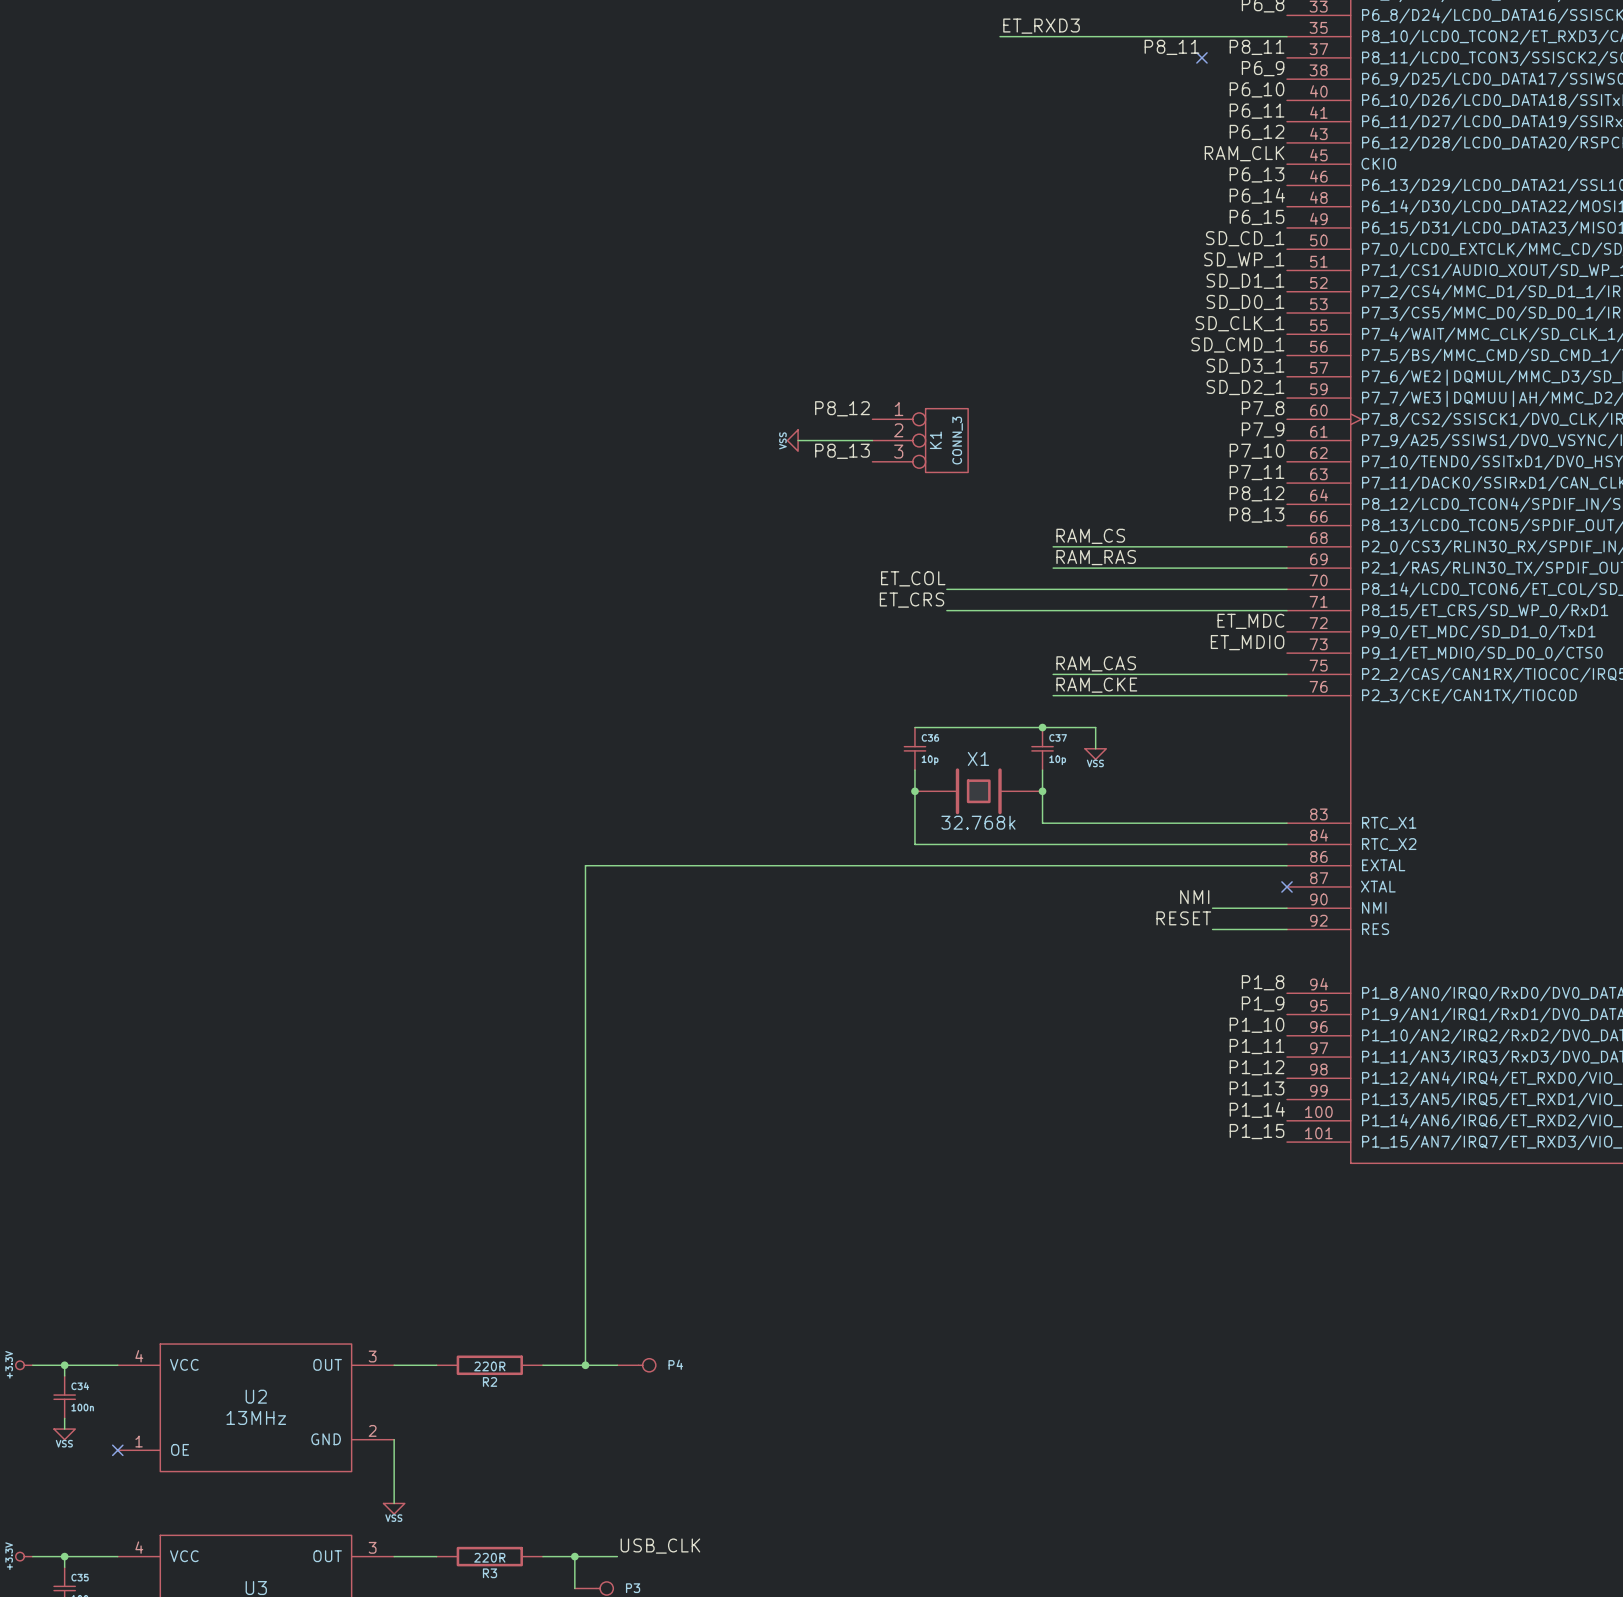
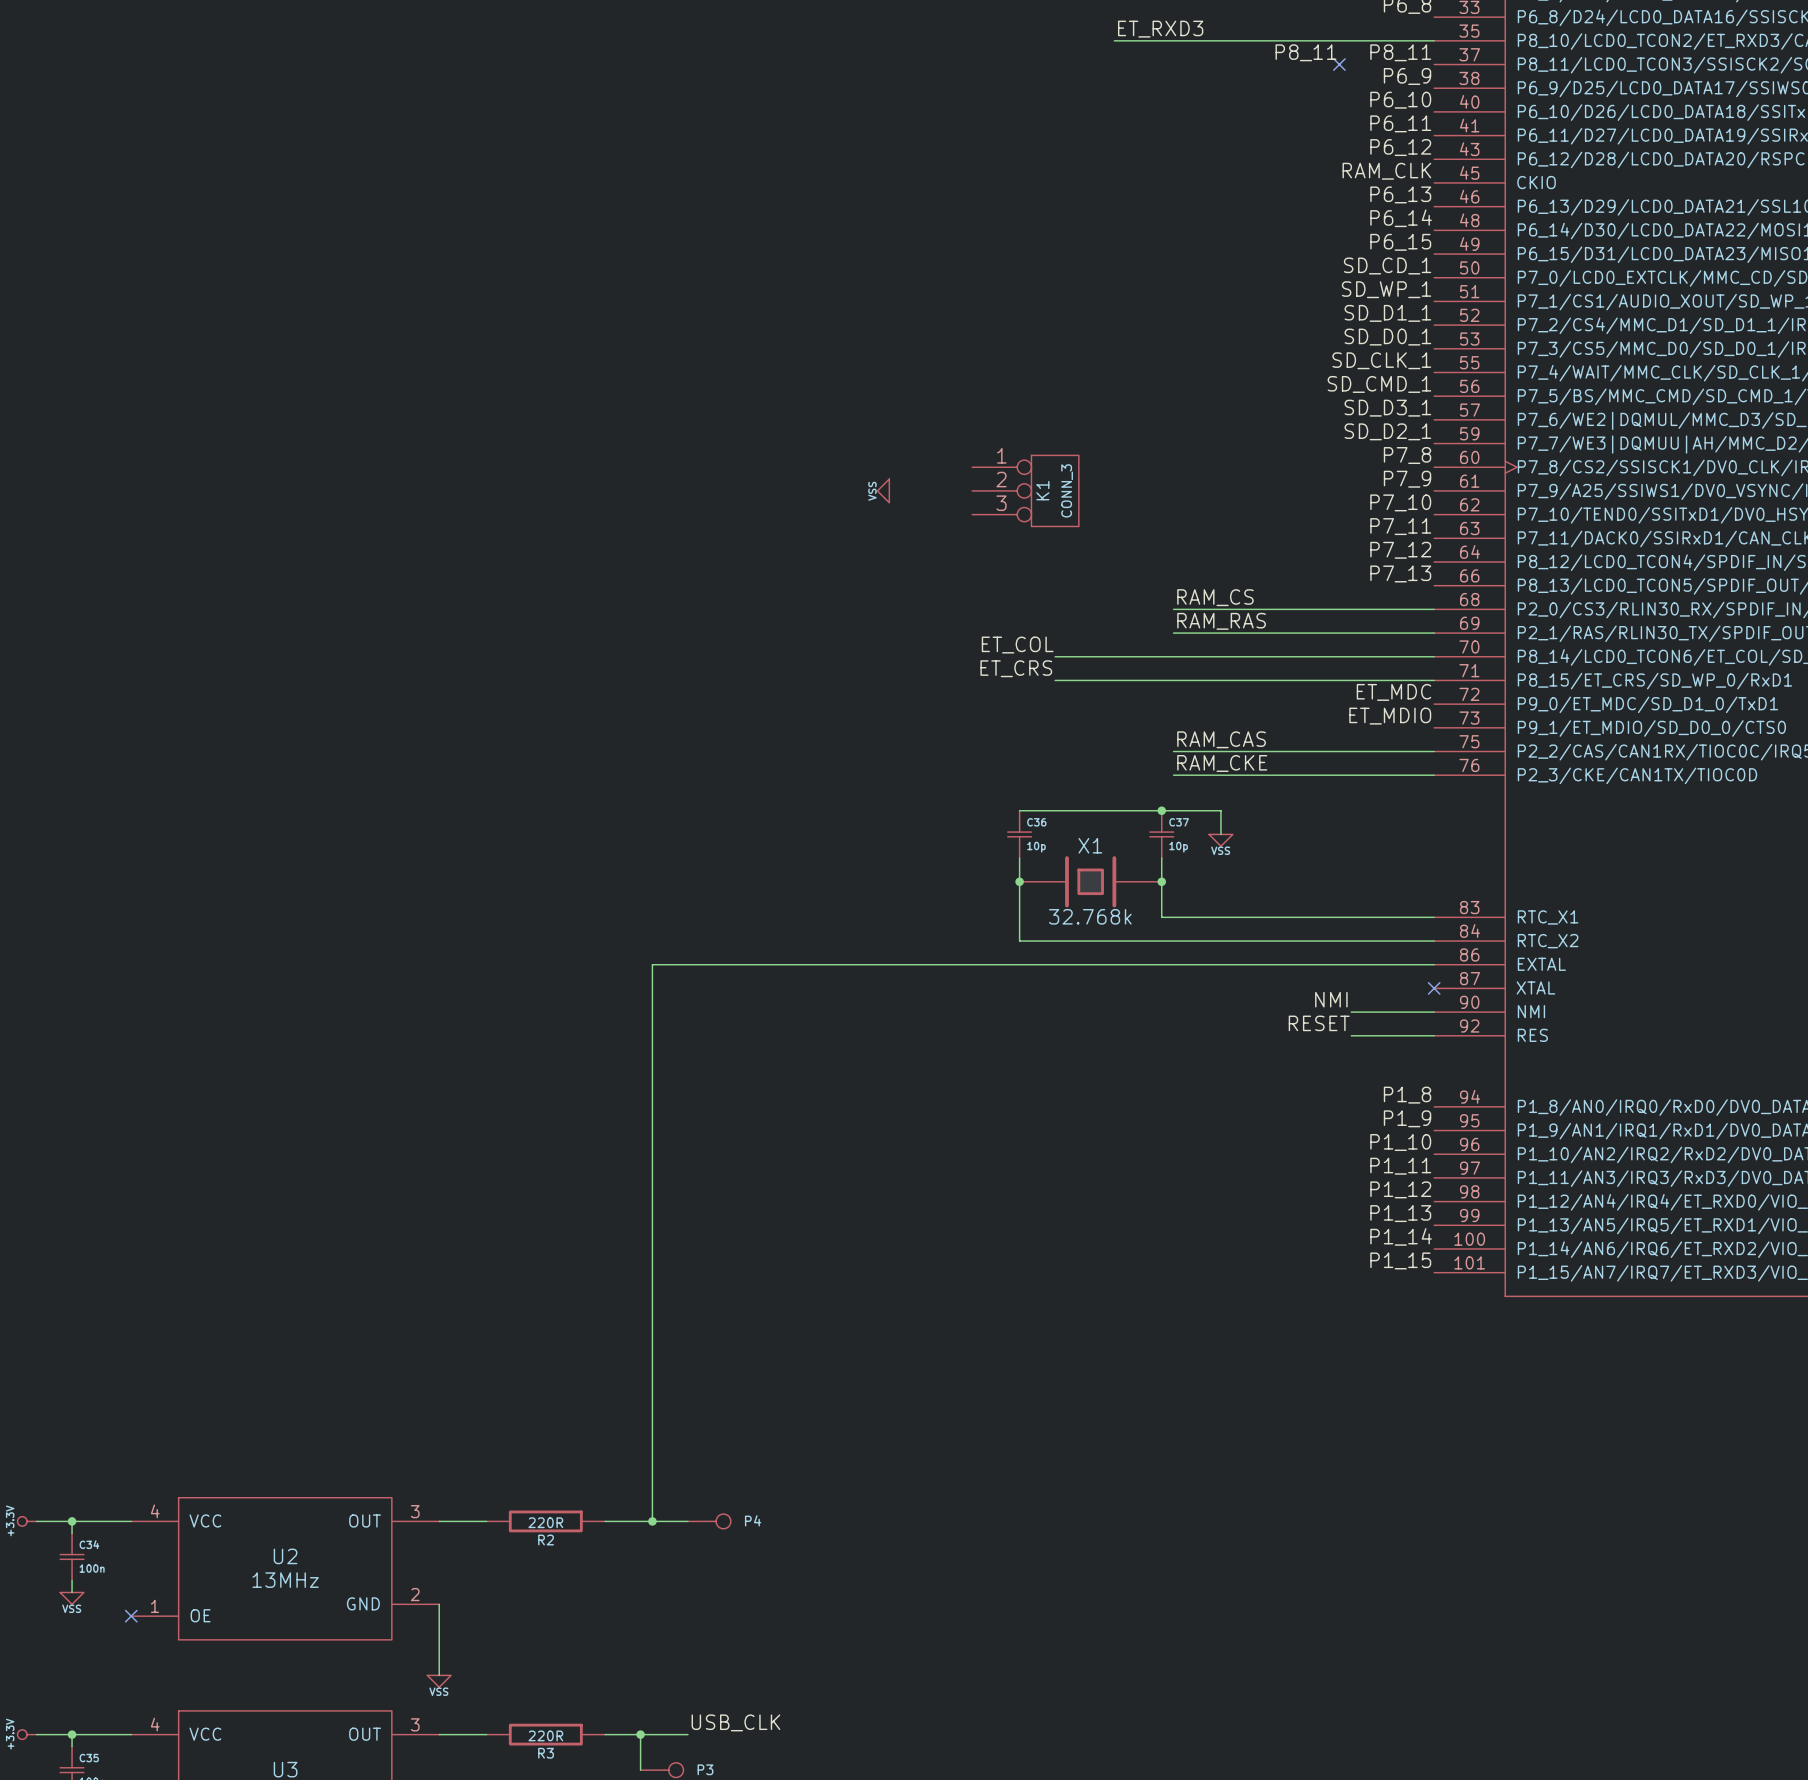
label: P8_12 (842, 408) -> none
wire: (798, 440) (872, 440) -> none
label: P8_13 (842, 451) -> none
label: P8_12 (1257, 493) -> P7_12 (1400, 550)
label: P8_13 (1257, 515) -> P7_13 (1400, 573)

